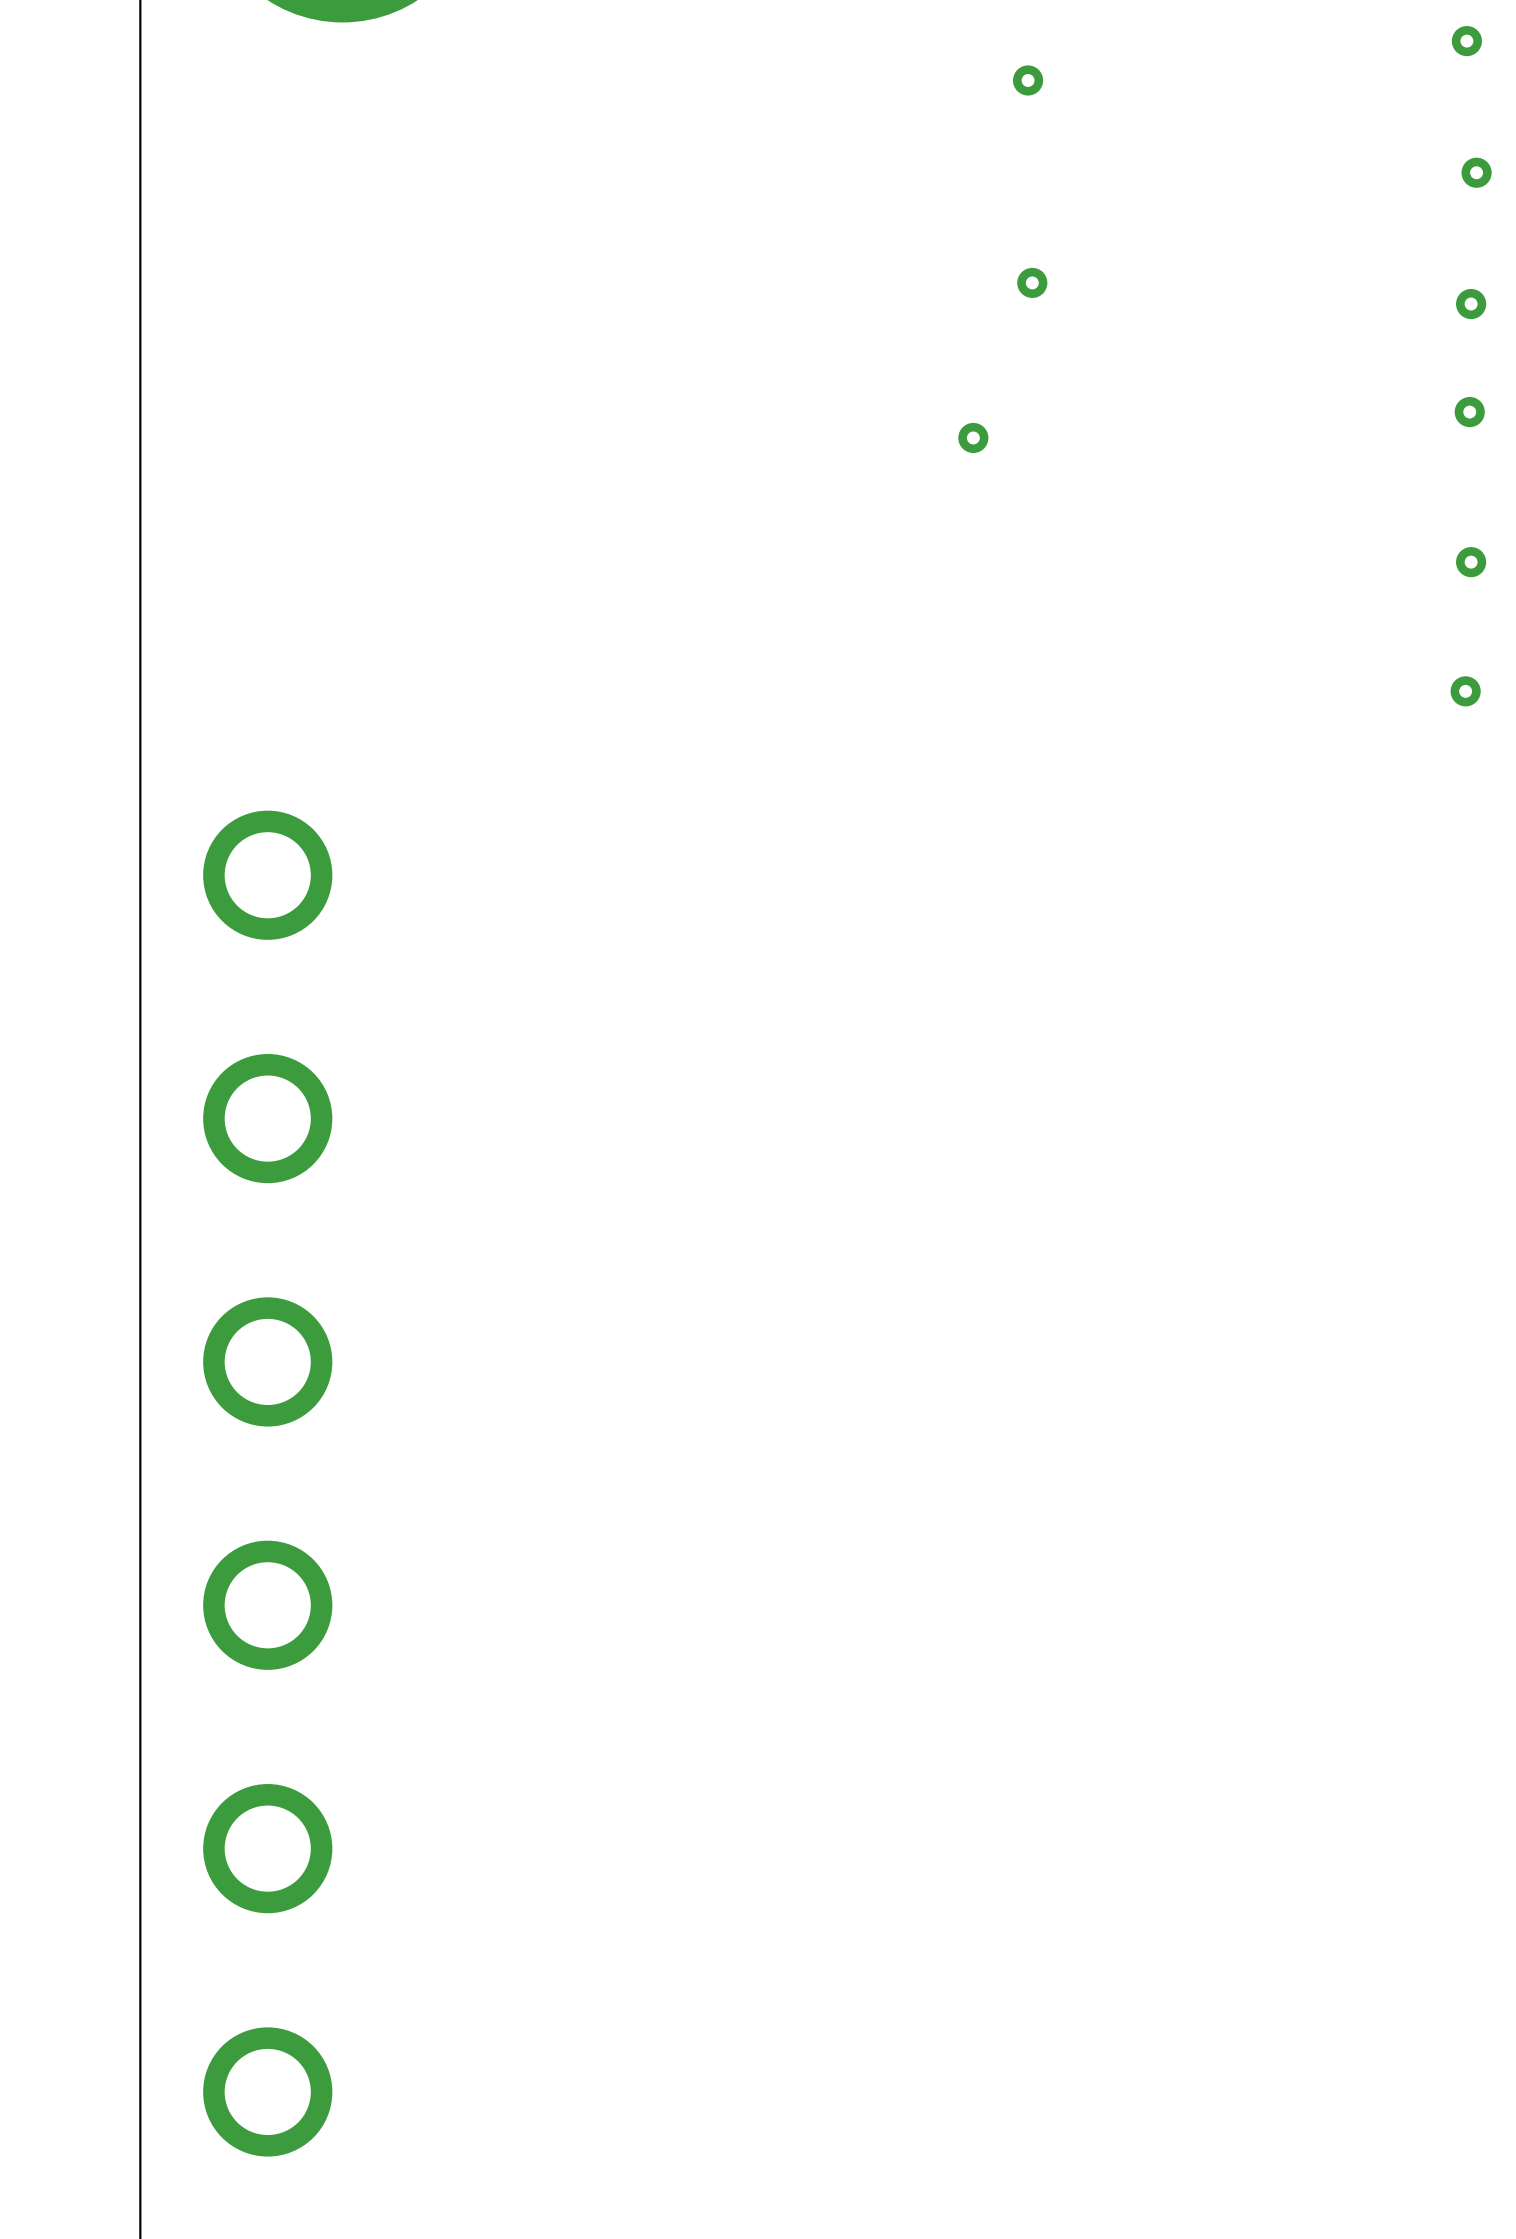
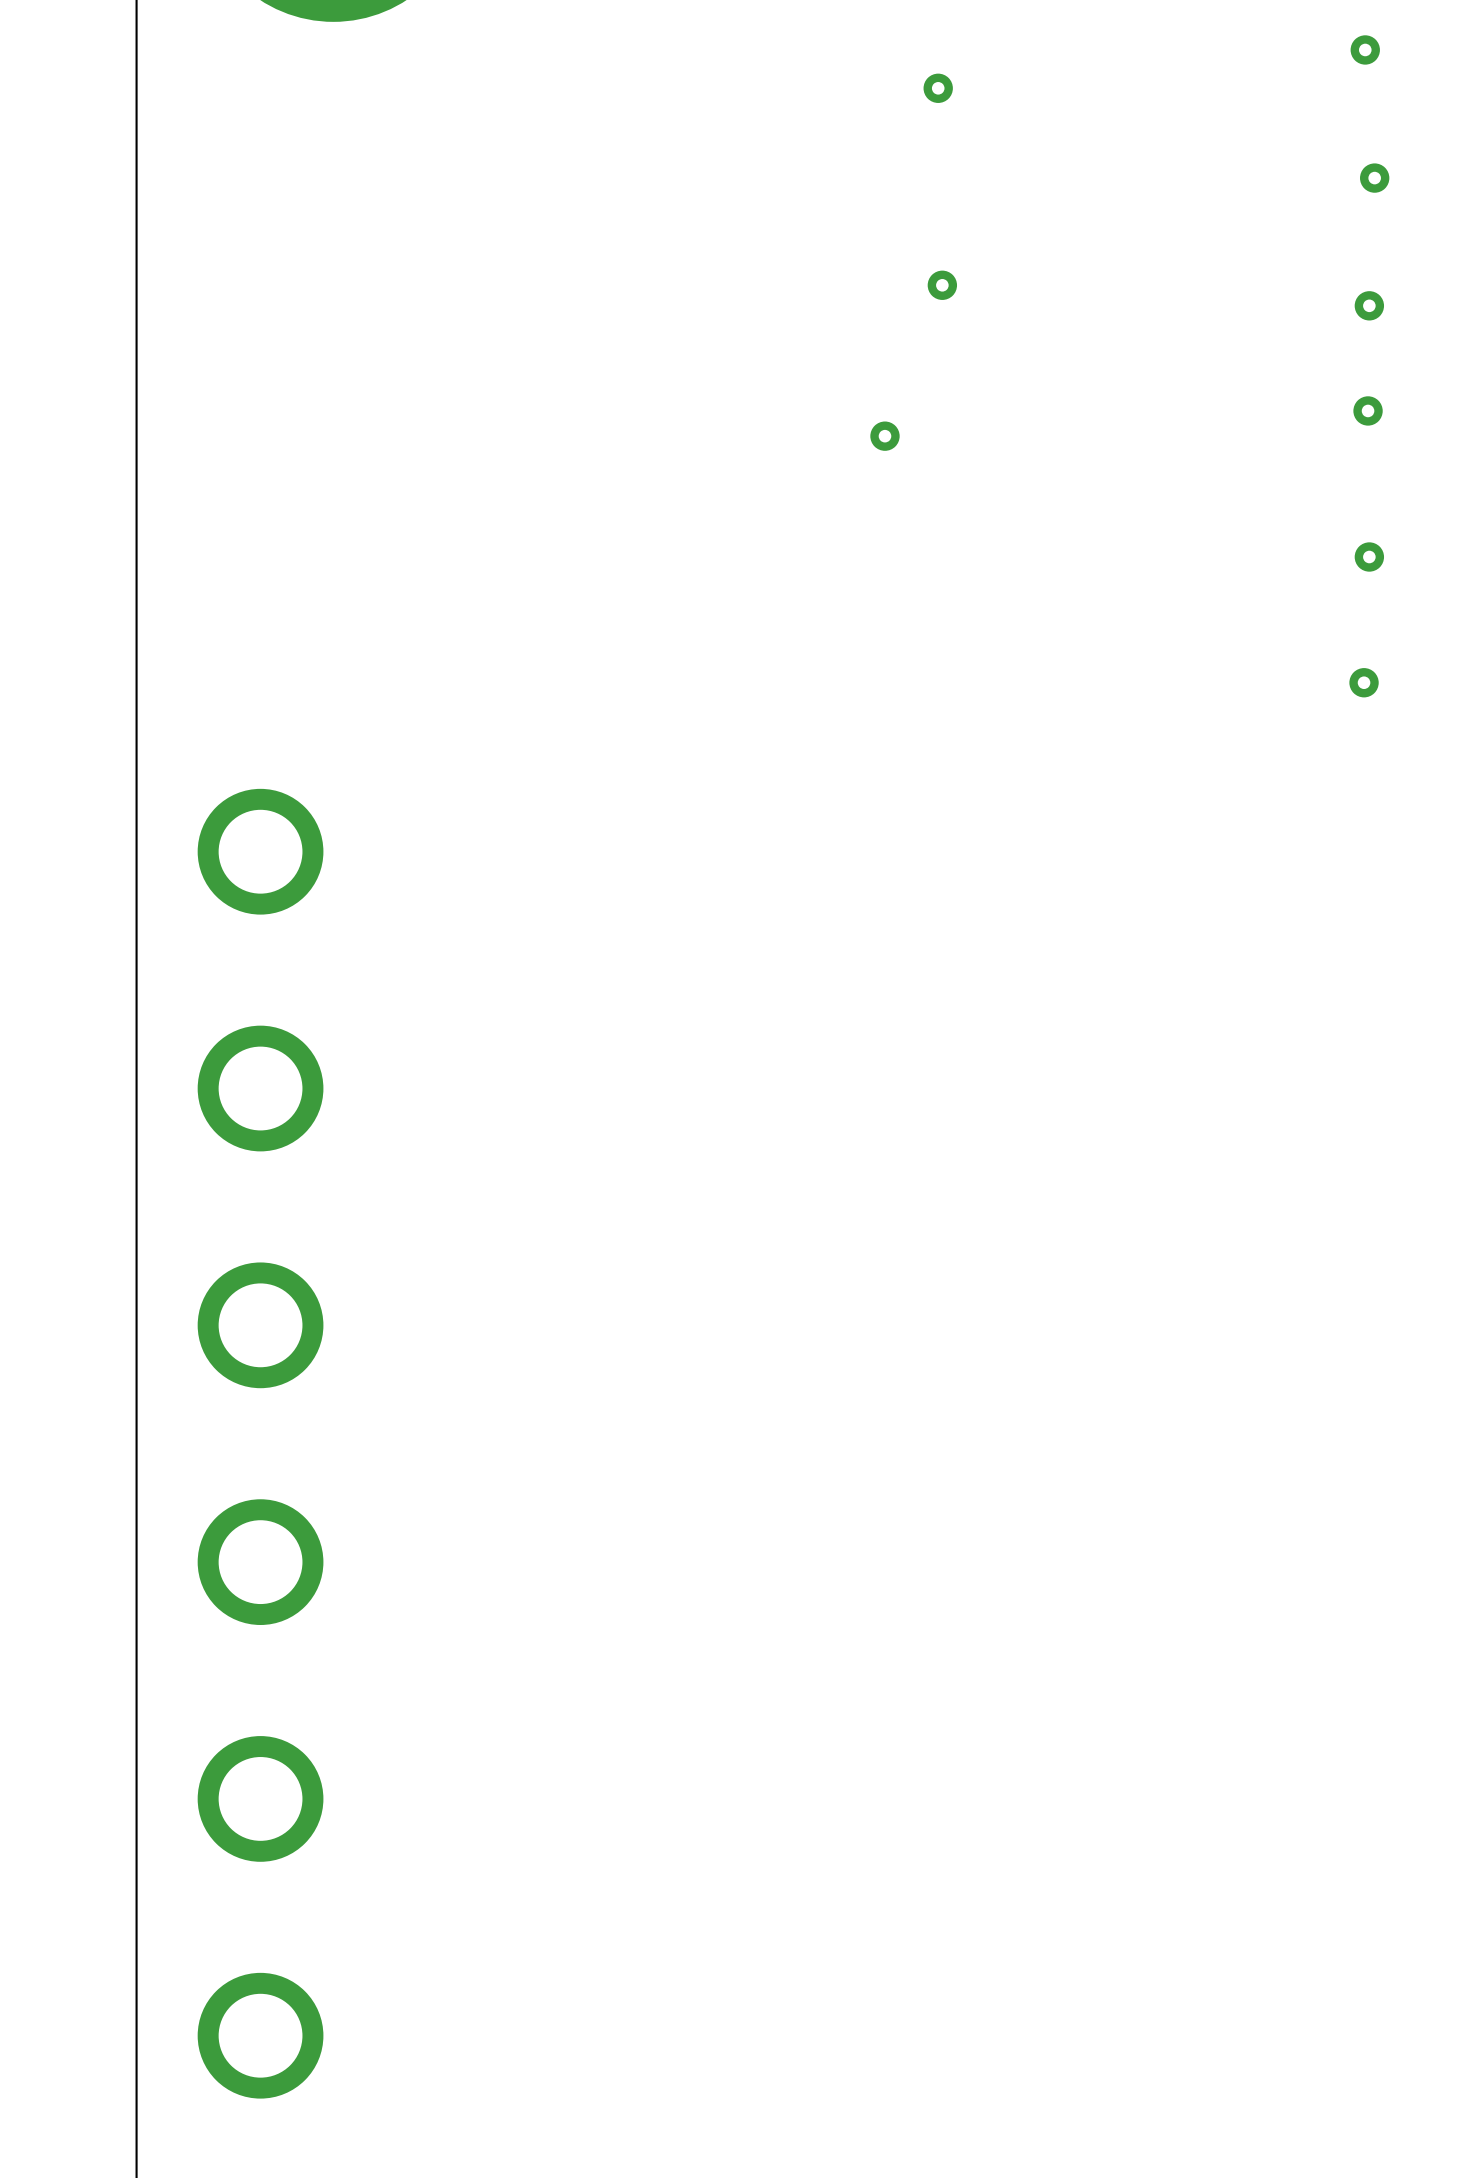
via position: (1466, 41) -> (1365, 49)
via position: (1028, 80) -> (938, 88)
via position: (1476, 172) -> (1374, 178)
via position: (1032, 282) -> (942, 285)
via: (1471, 304) -> none
via: none -> (1369, 305)
via: (1469, 412) -> none
via: none -> (1368, 410)
via position: (973, 437) -> (884, 436)
via position: (1471, 562) -> (1369, 557)
via position: (1465, 691) -> (1364, 682)

